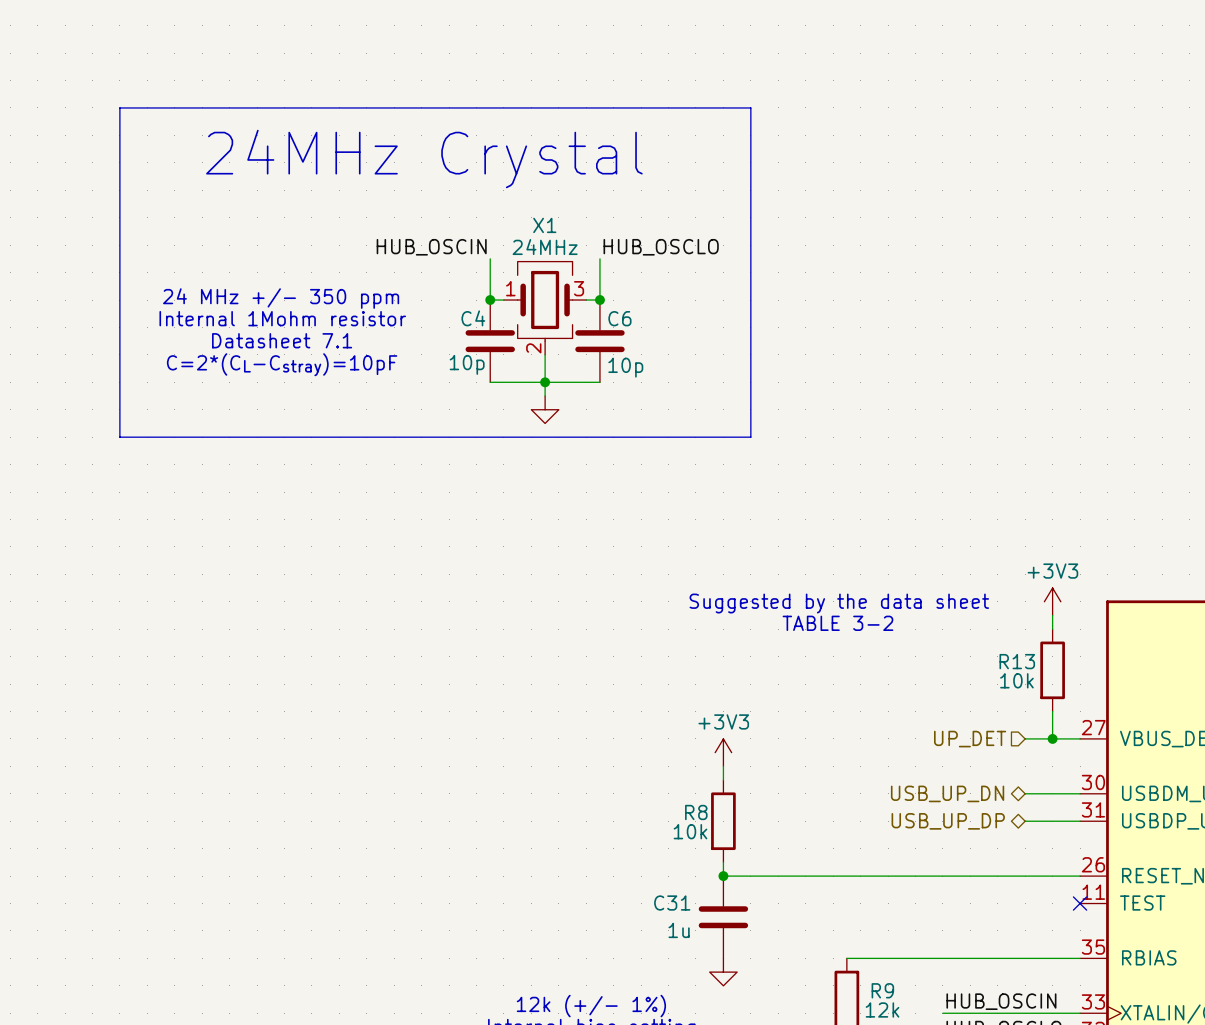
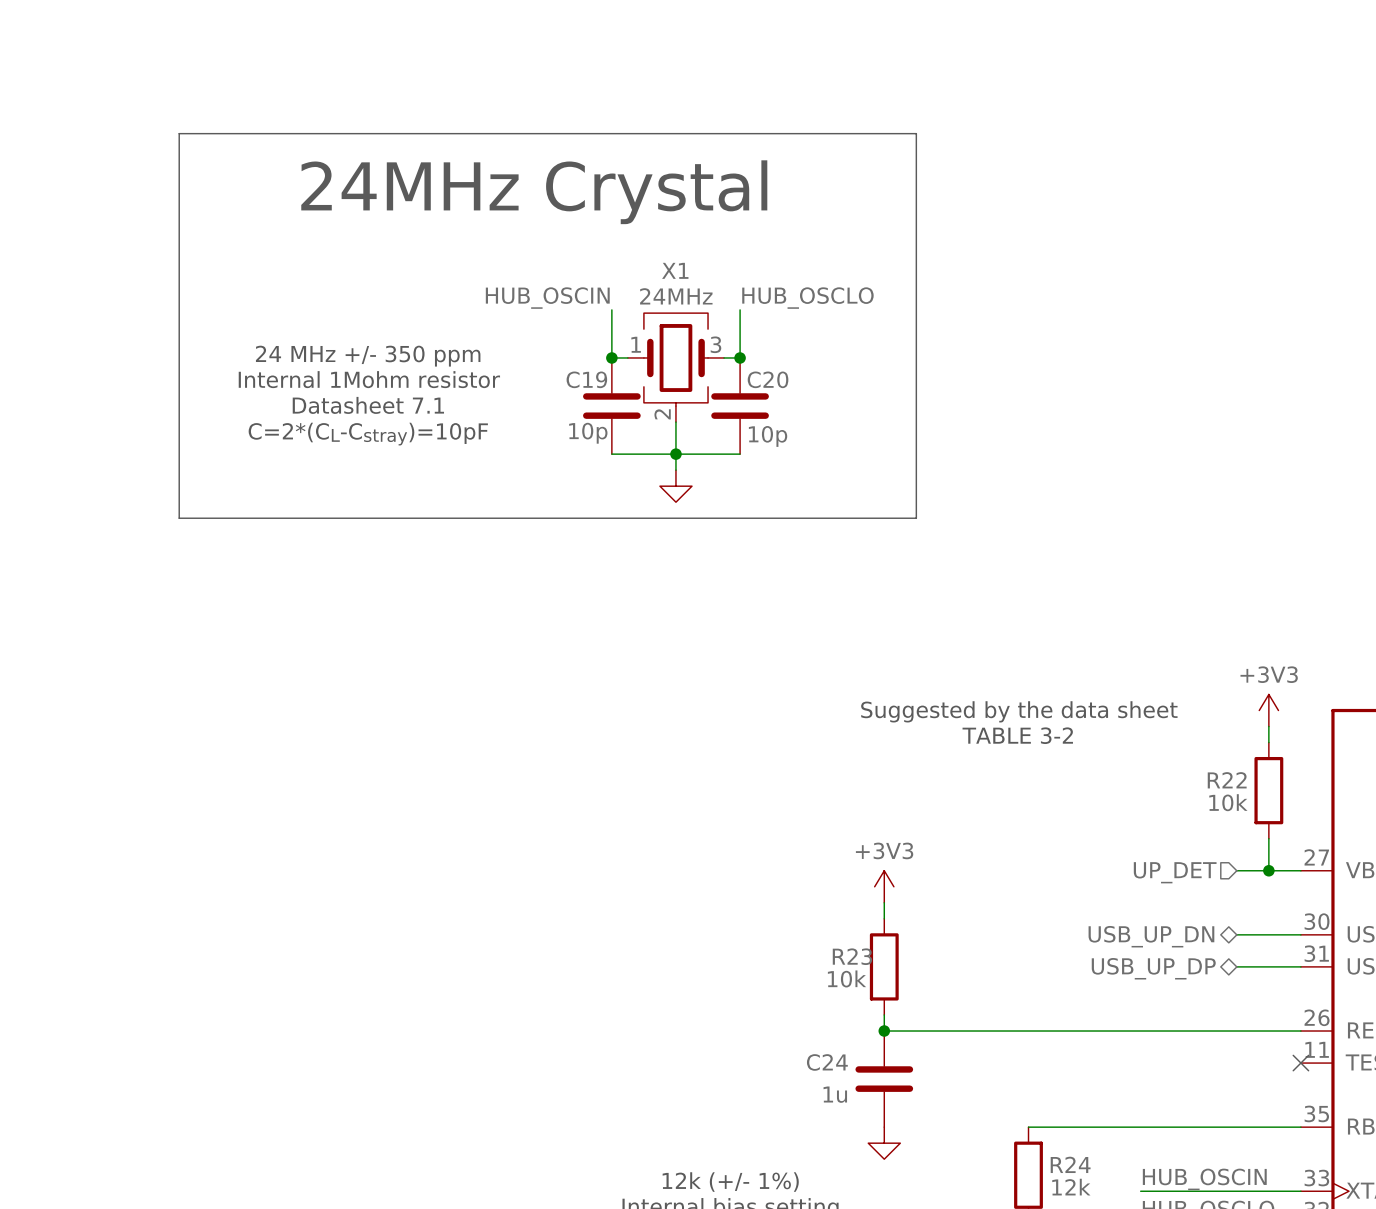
C4 name: C4 (473, 318) -> C19 (586, 379)
C6 name: C6 (619, 318) -> C20 (768, 379)
R13 name: R13 (1017, 661) -> R22 (1227, 780)
R8 name: R8 (696, 812) -> R23 (852, 956)
C31 name: C31 (672, 903) -> C24 (827, 1062)
R9 name: R9 (882, 990) -> R24 (1070, 1164)

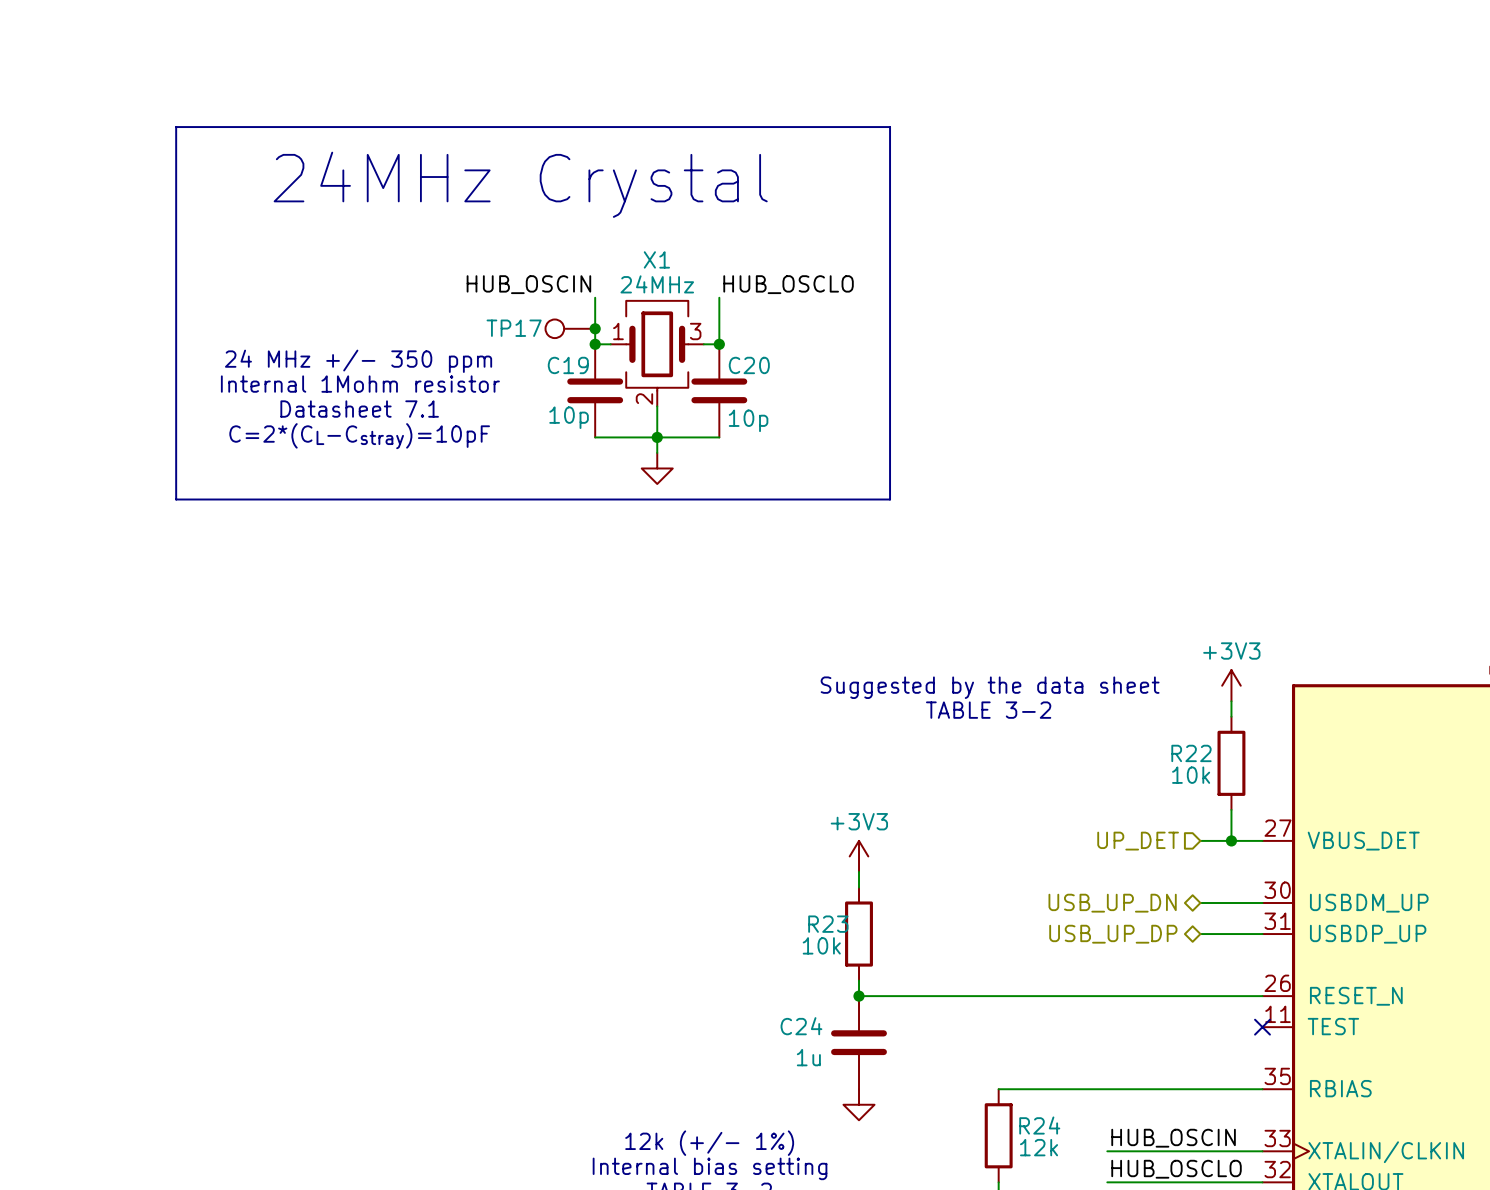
TP17: none -> (570, 328)
junction: none -> (595, 328)
text: 24 MHz +/- 350 ppm (368, 356) -> none
text: Internal 1Mohm resistor (369, 379) -> 24 MHz +/- 350 ppm (358, 361)
text: Datasheet 7.1 (368, 405) -> Internal 1Mohm resistor (360, 384)
text: C=2*(CL-Cstray)=10pF (368, 434) -> Datasheet 7.1 (359, 409)
text: none -> C=2*(CL-Cstray)=10pF (359, 436)

